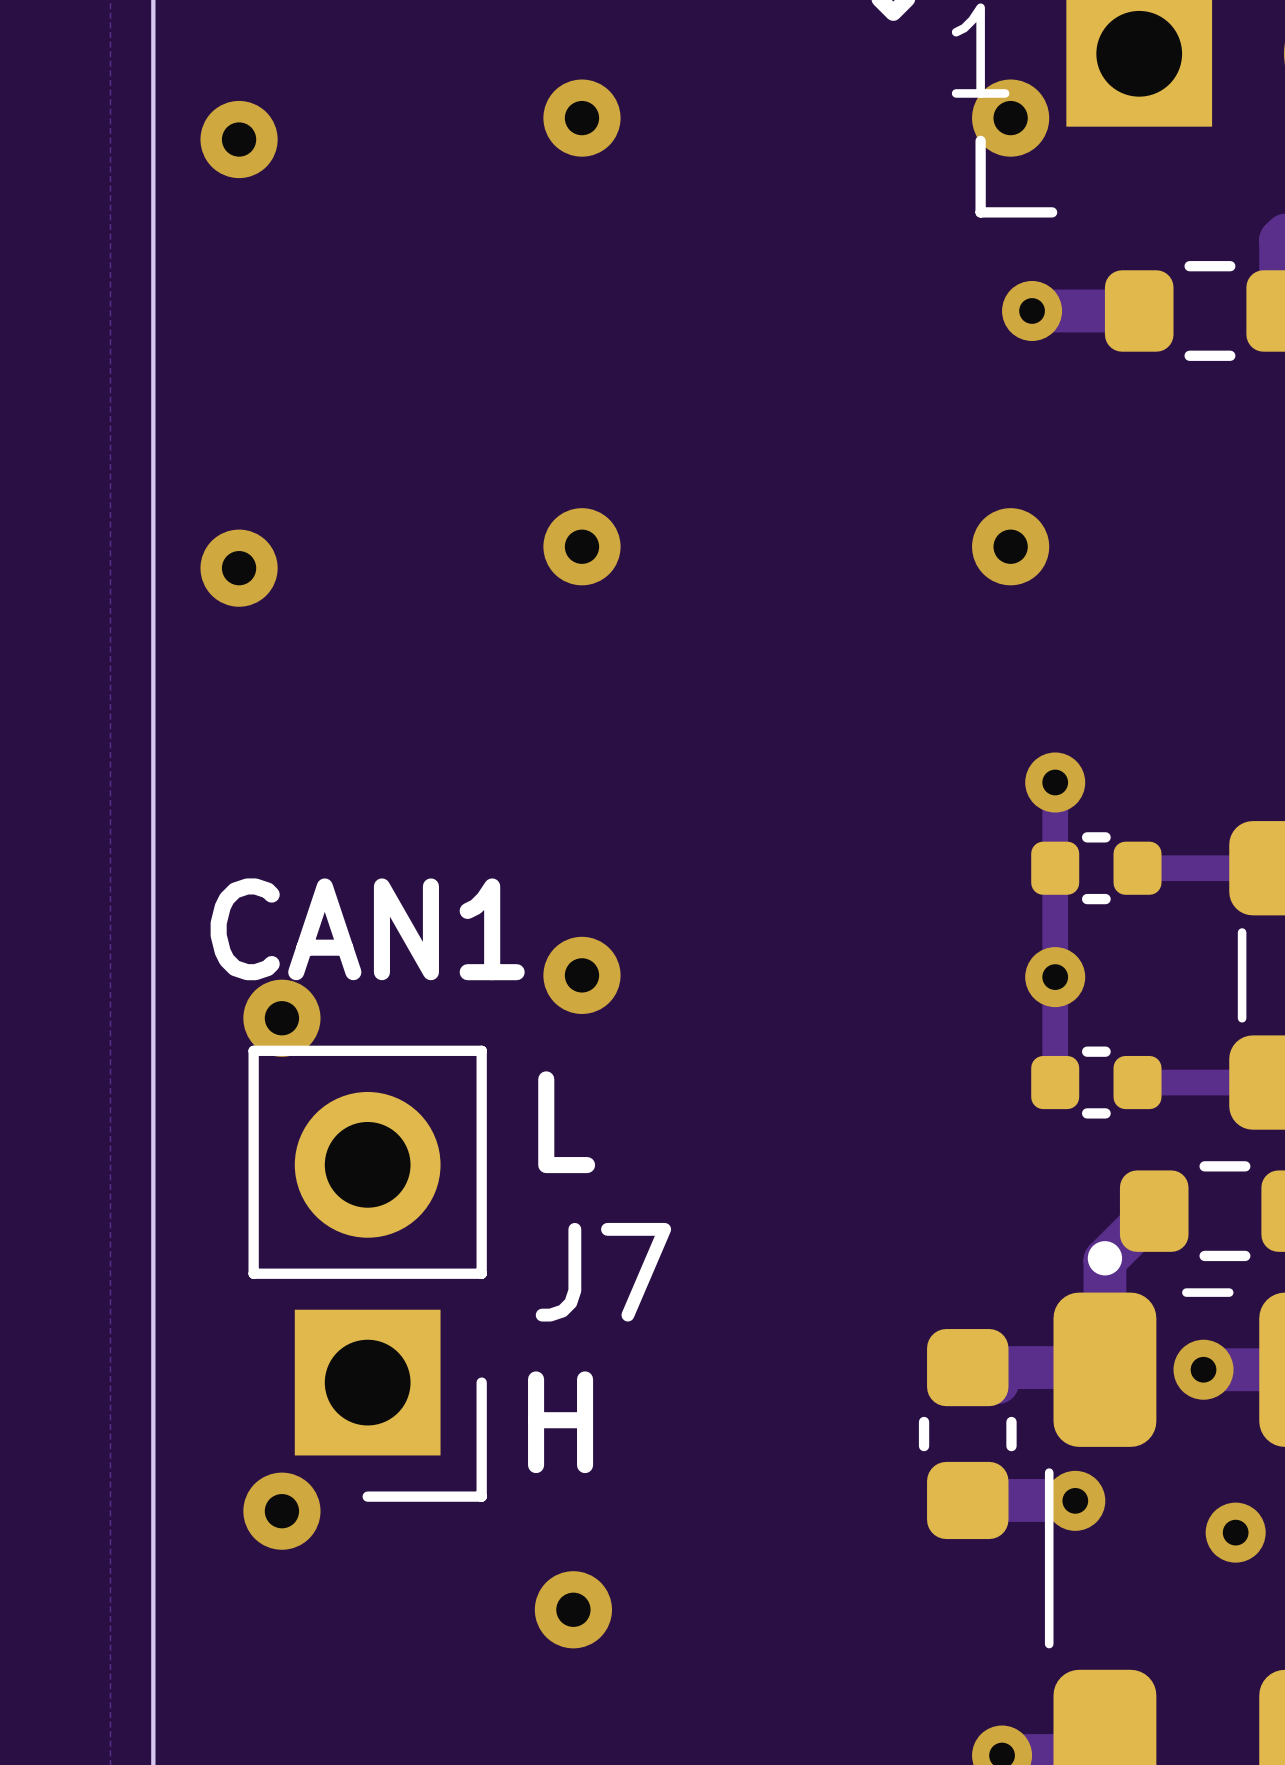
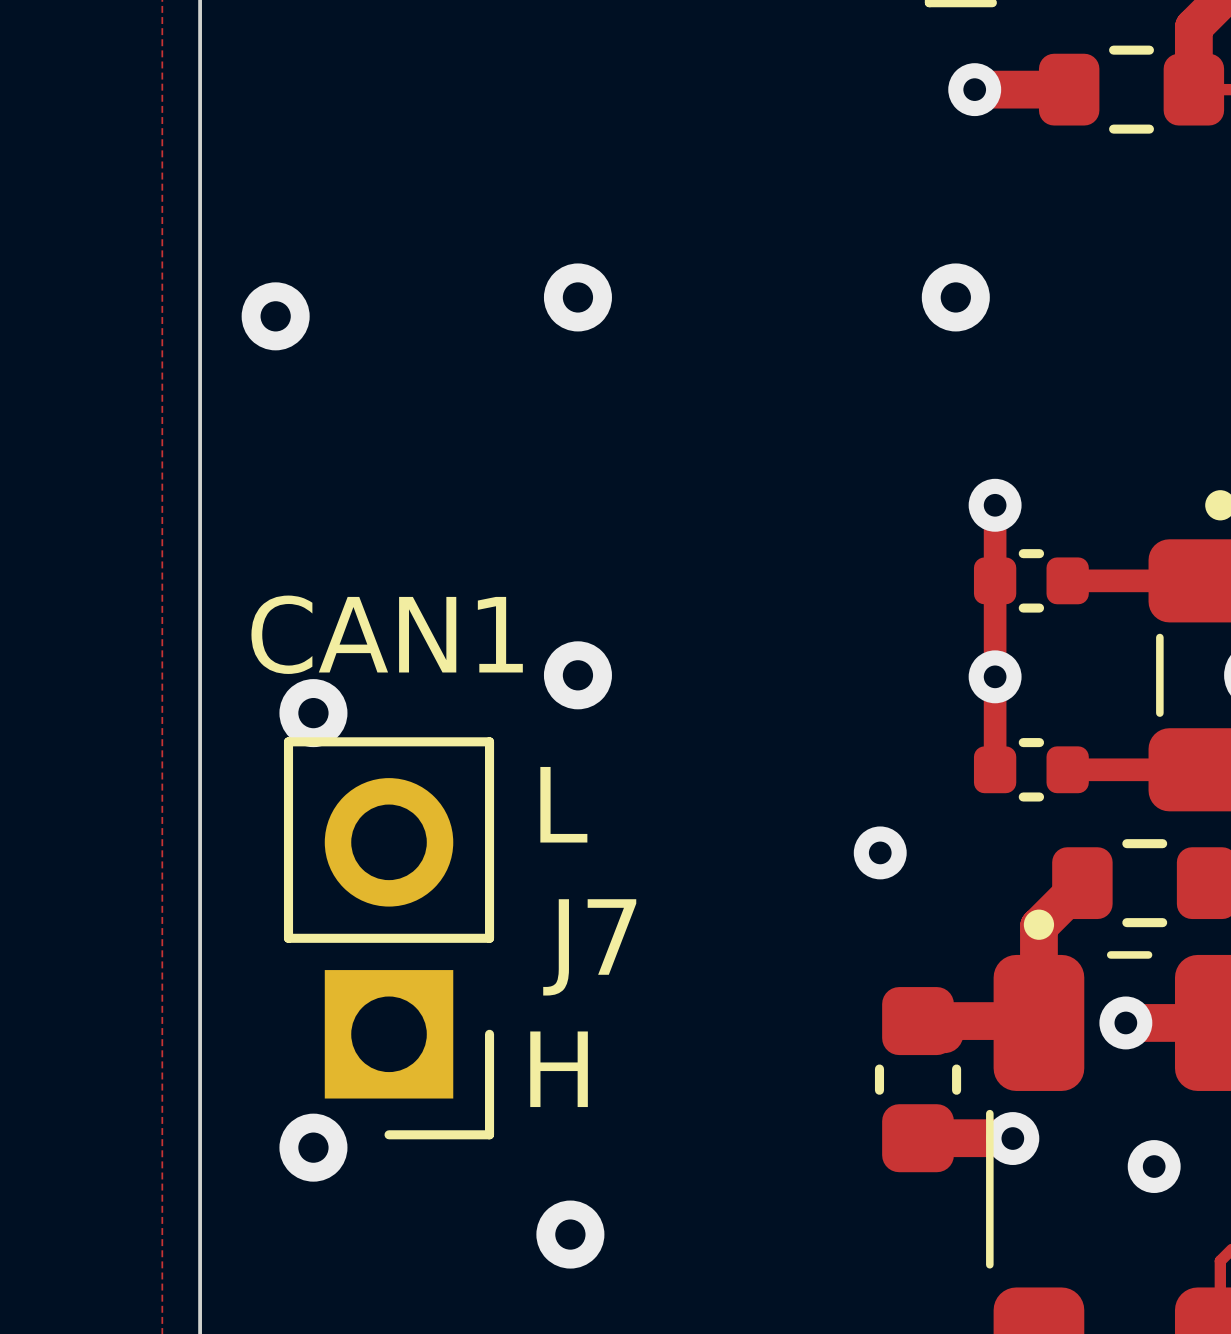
via: none -> (880, 852)

